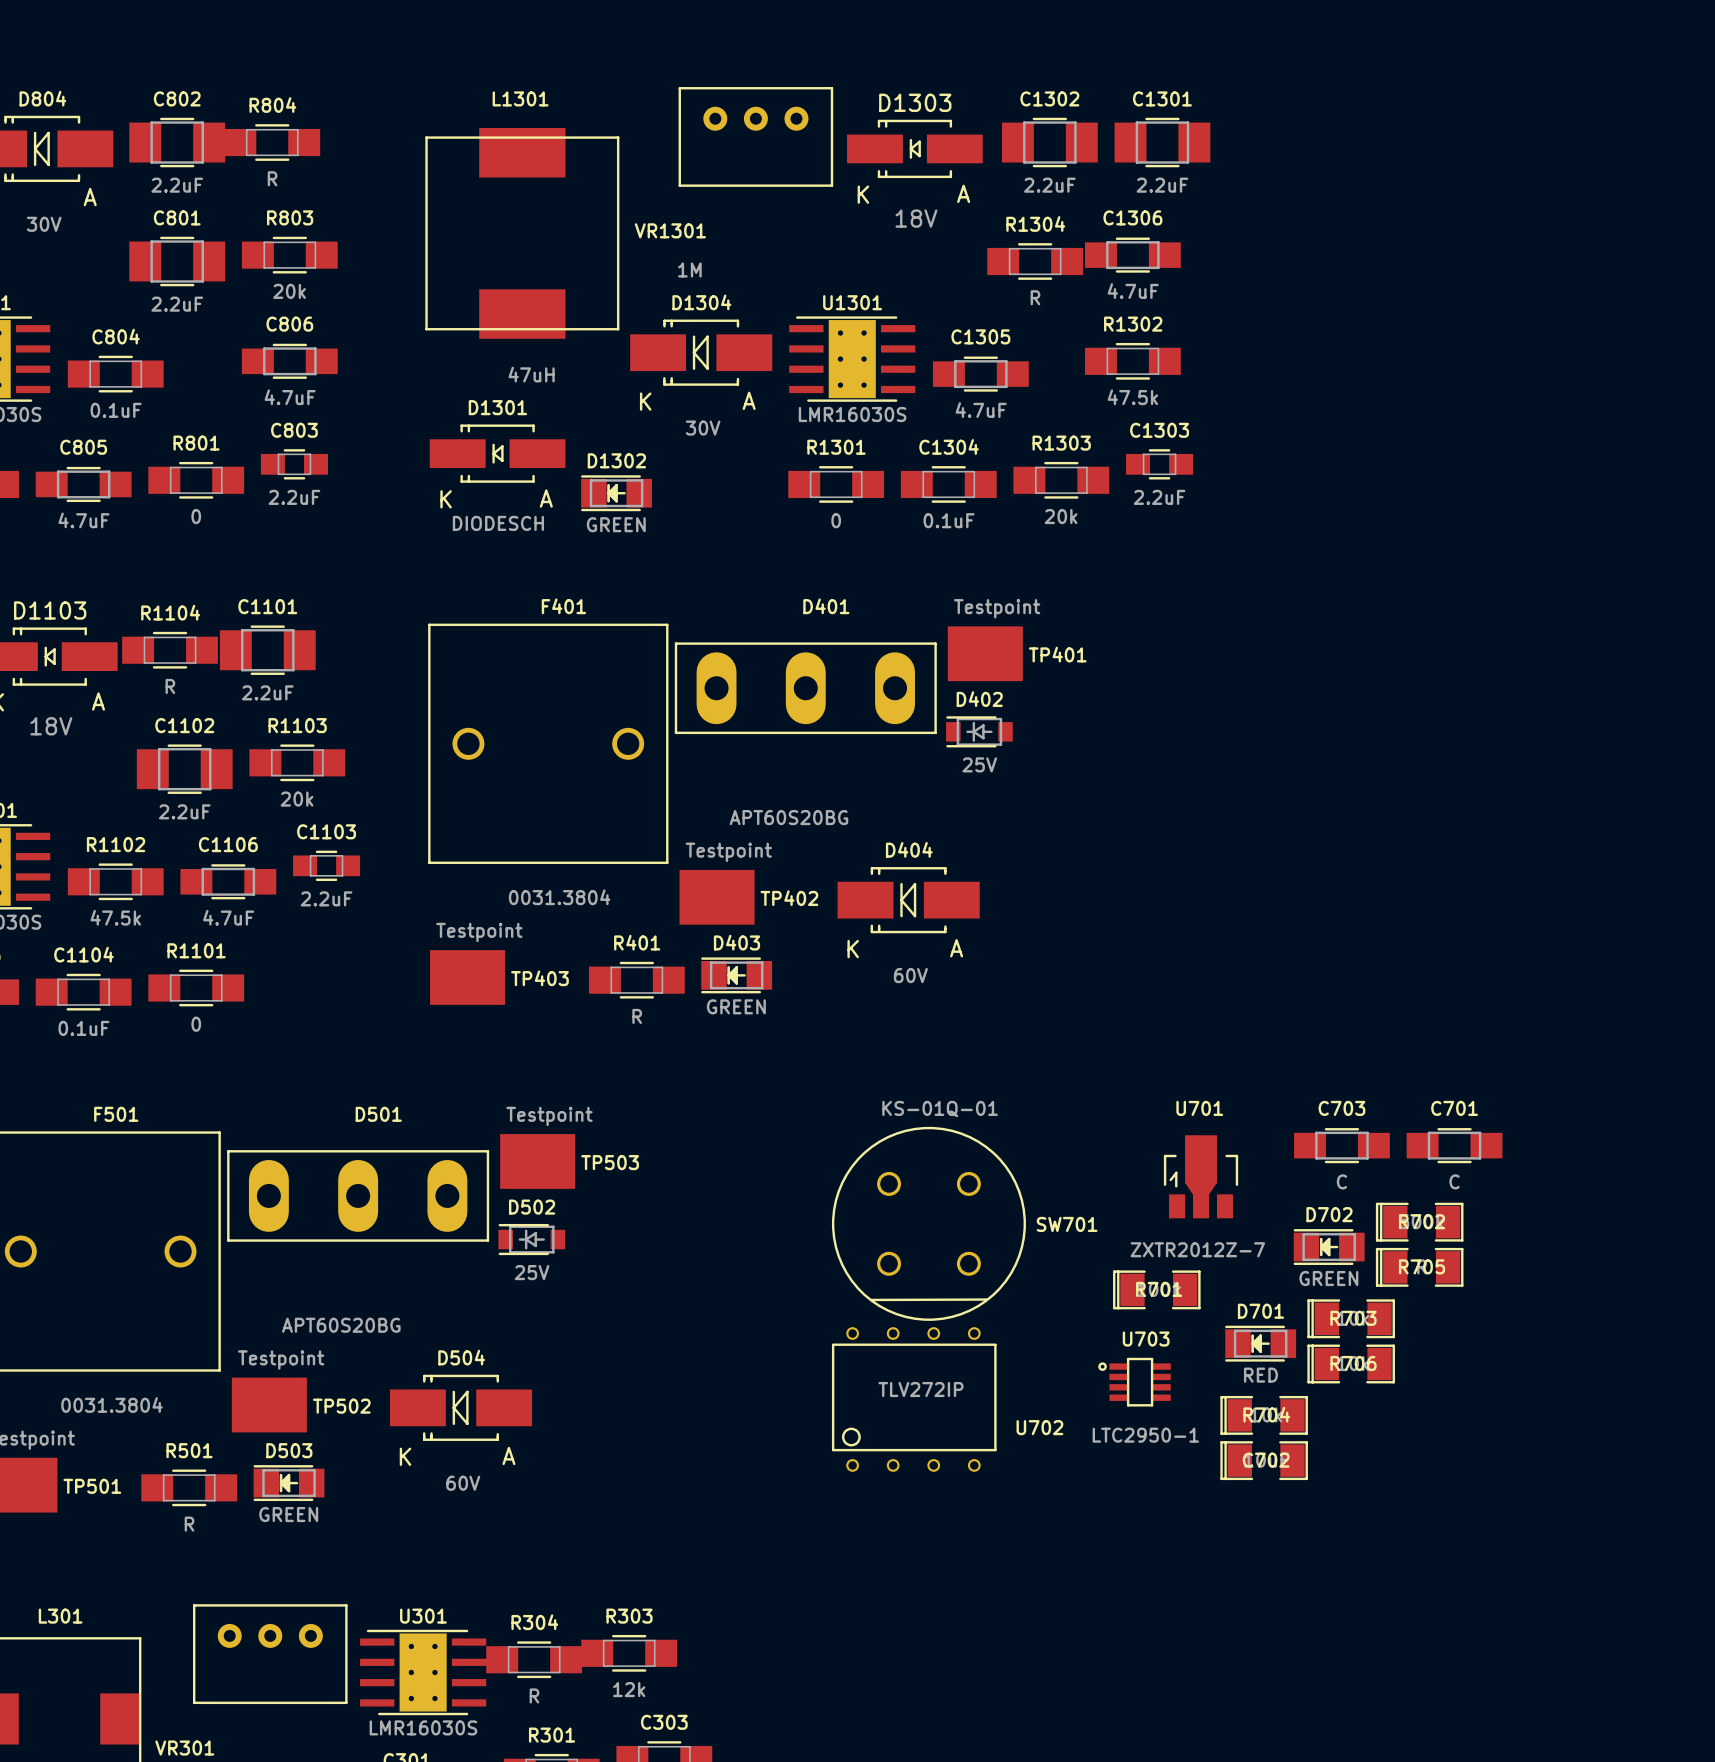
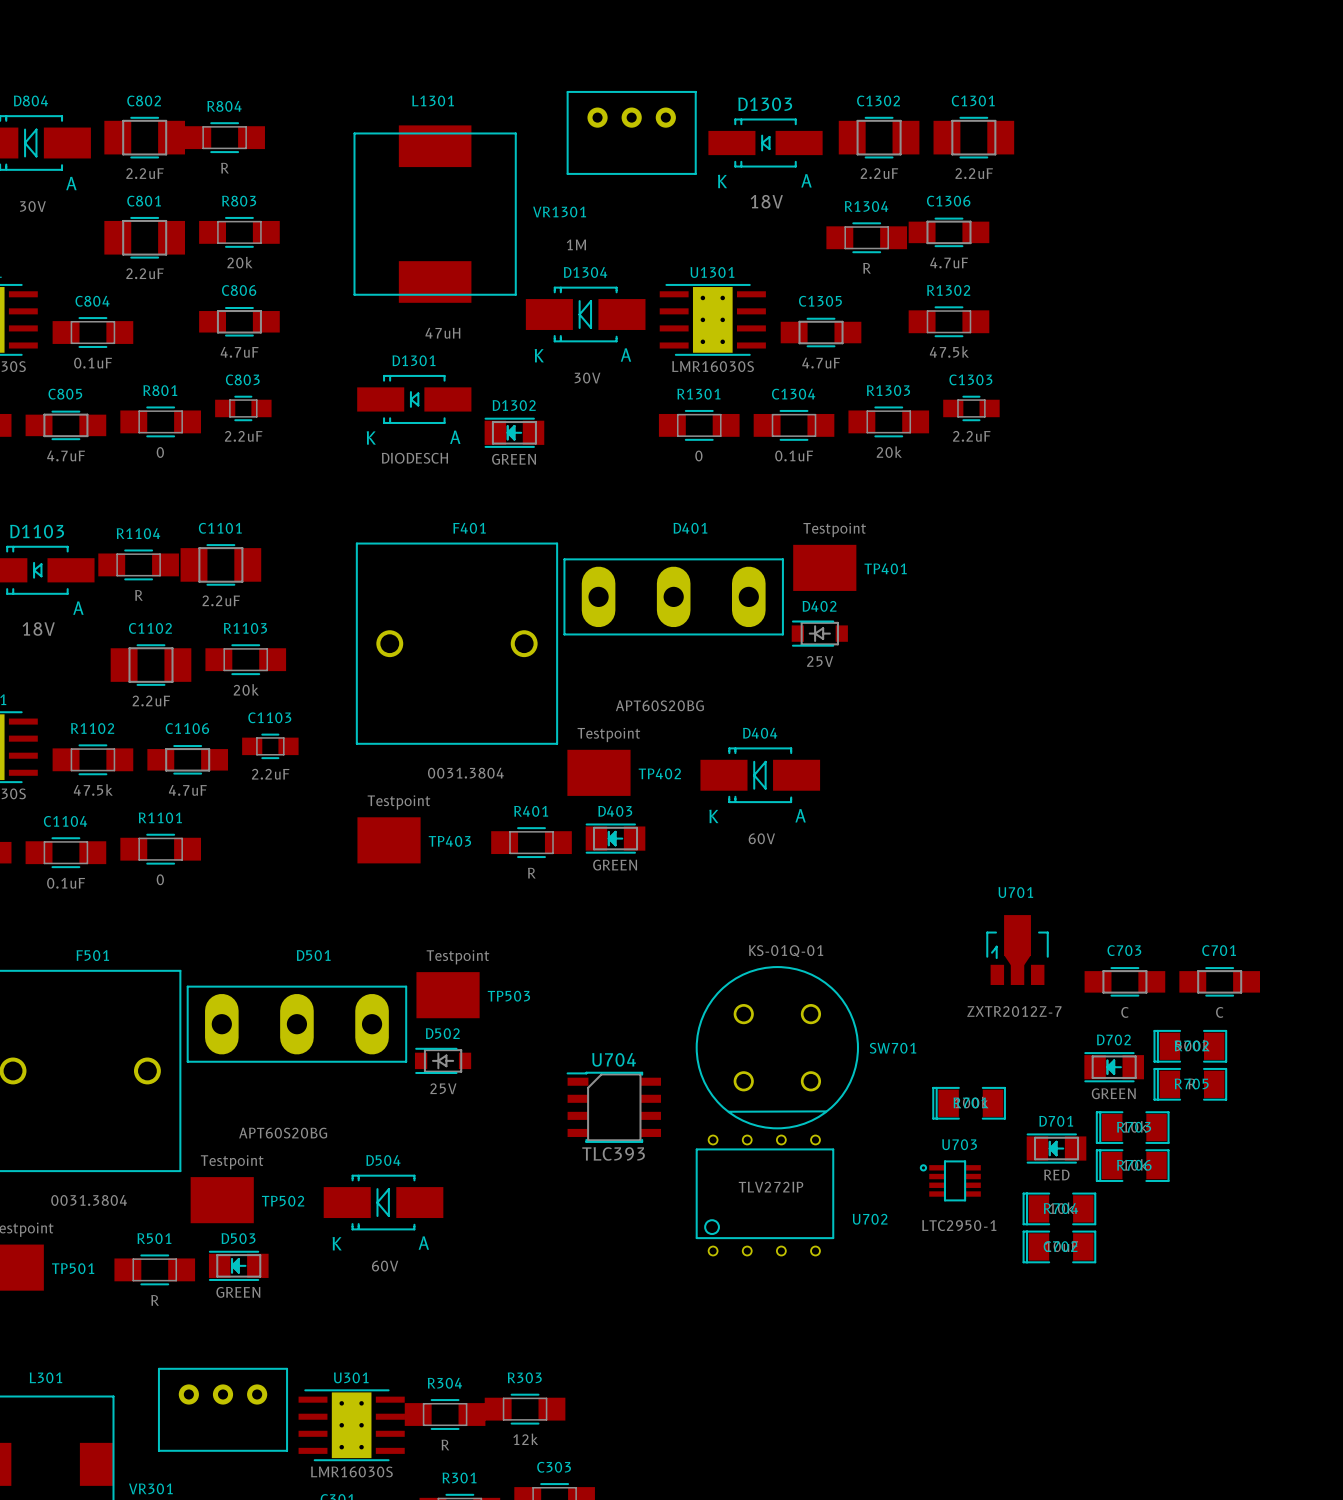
U701 position: (1201, 1176) -> (1017, 950)
U704: none -> TLC393 (613, 1107)

